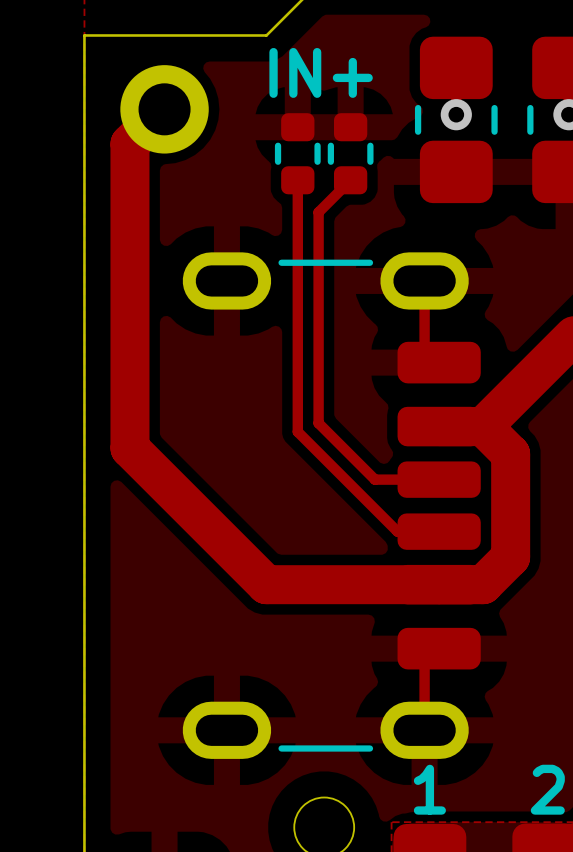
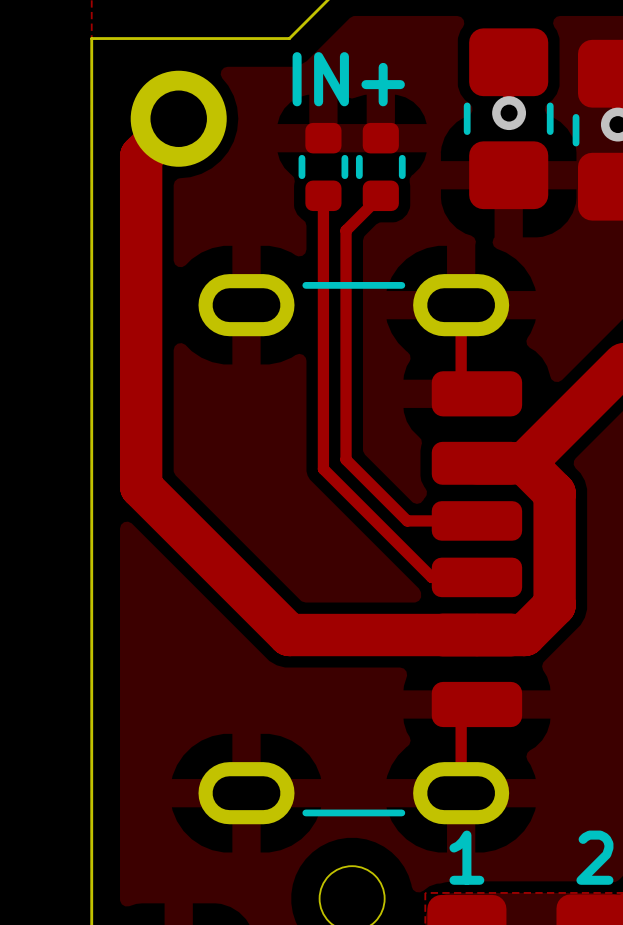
via position: (456, 114) -> (509, 113)
part position: (456, 119) -> (508, 118)

